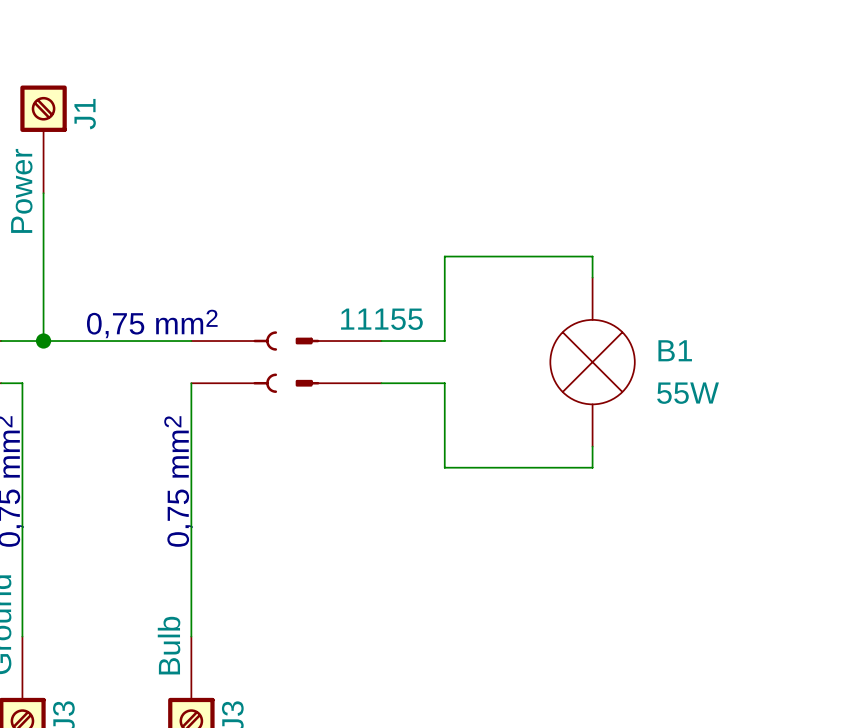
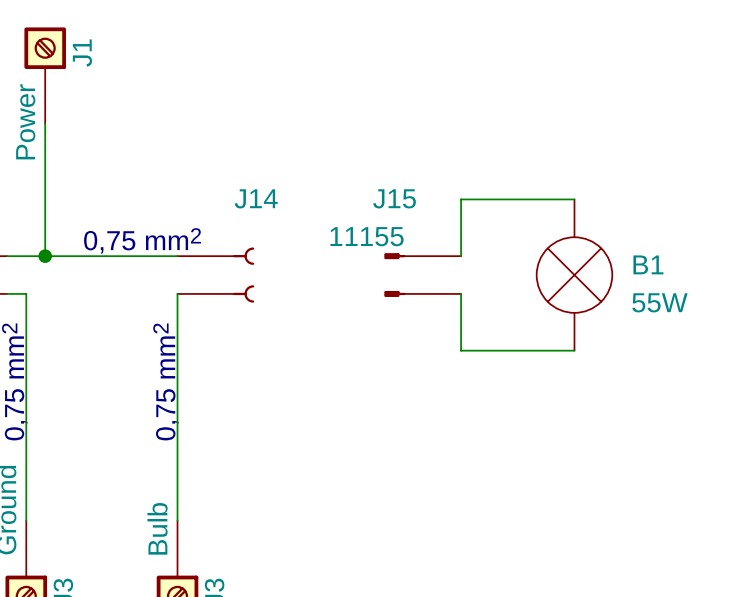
J14 name: none -> J14 (256, 198)
wire: (592, 277) (592, 256) (444, 256) (444, 341) (381, 341) -> none
wire: none -> (574, 199) (461, 199) (461, 256)
part: 11155 (338, 362) -> none
J15: none -> 11155 (422, 275)
B1 position: (592, 362) -> (574, 275)
wire: (381, 383) (444, 383) (444, 467) (592, 467) (592, 446) -> none
wire: none -> (461, 293) (461, 350) (574, 350)

